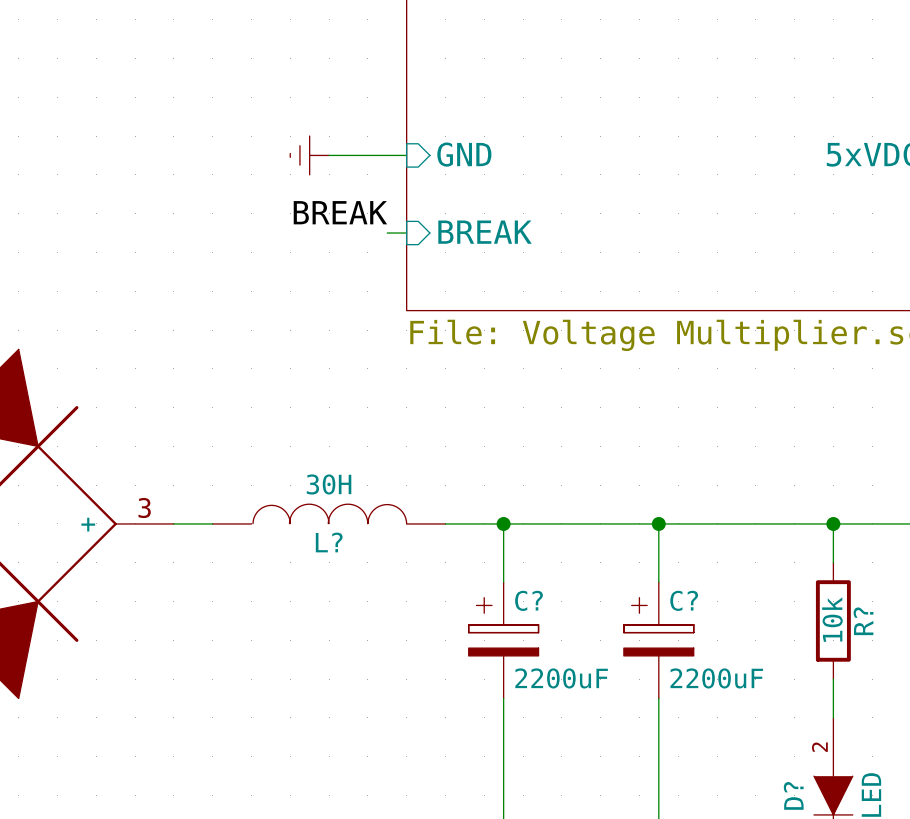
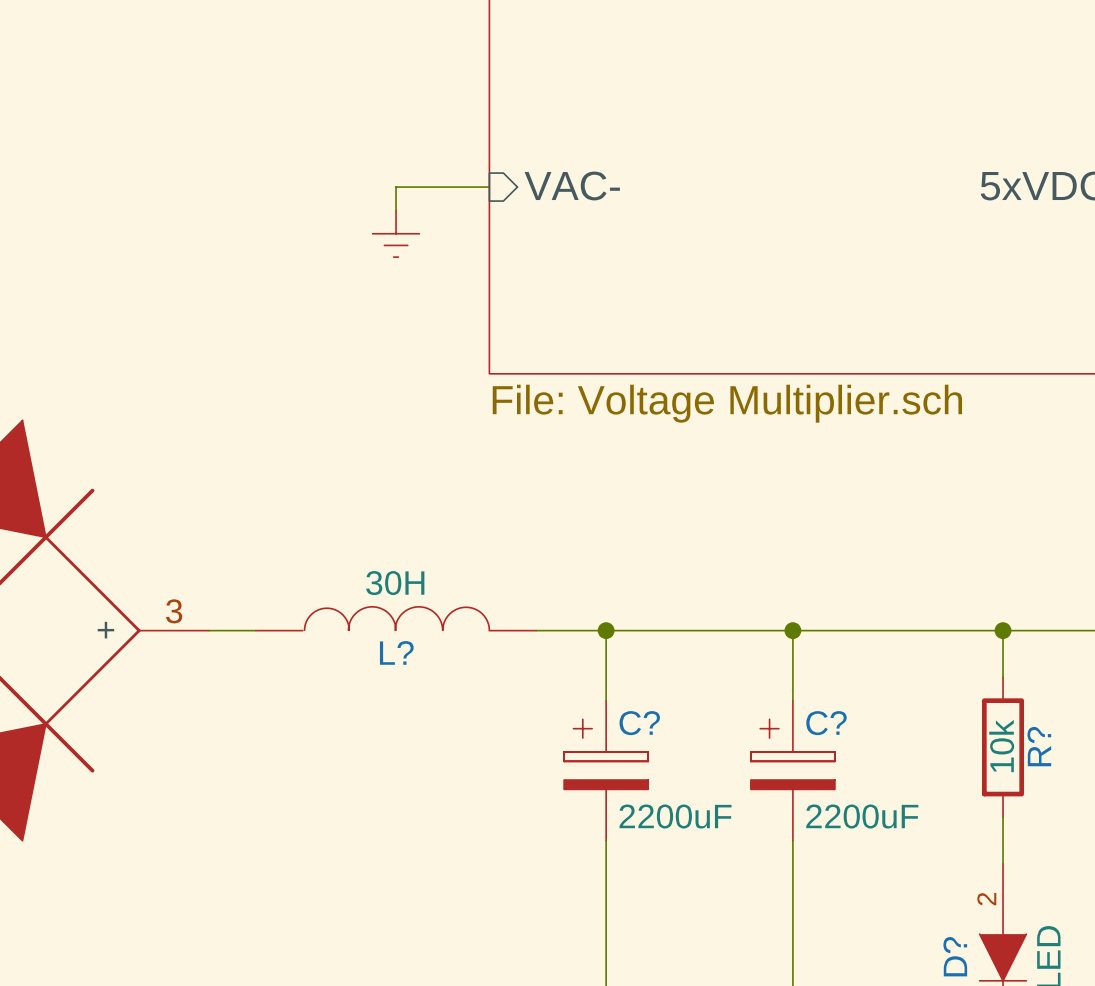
sheet pin: GND (464, 154) -> VAC- (572, 186)
power symbol rotation: 0° (309, 155) -> 90° counterclockwise (396, 233)
power symbol position: (309, 155) -> (396, 233)
wire: none -> (396, 187) (396, 210)
label: BREAK (340, 212) -> none
sheet pin: BREAK (485, 232) -> none
wire: (387, 233) (406, 233) -> none

